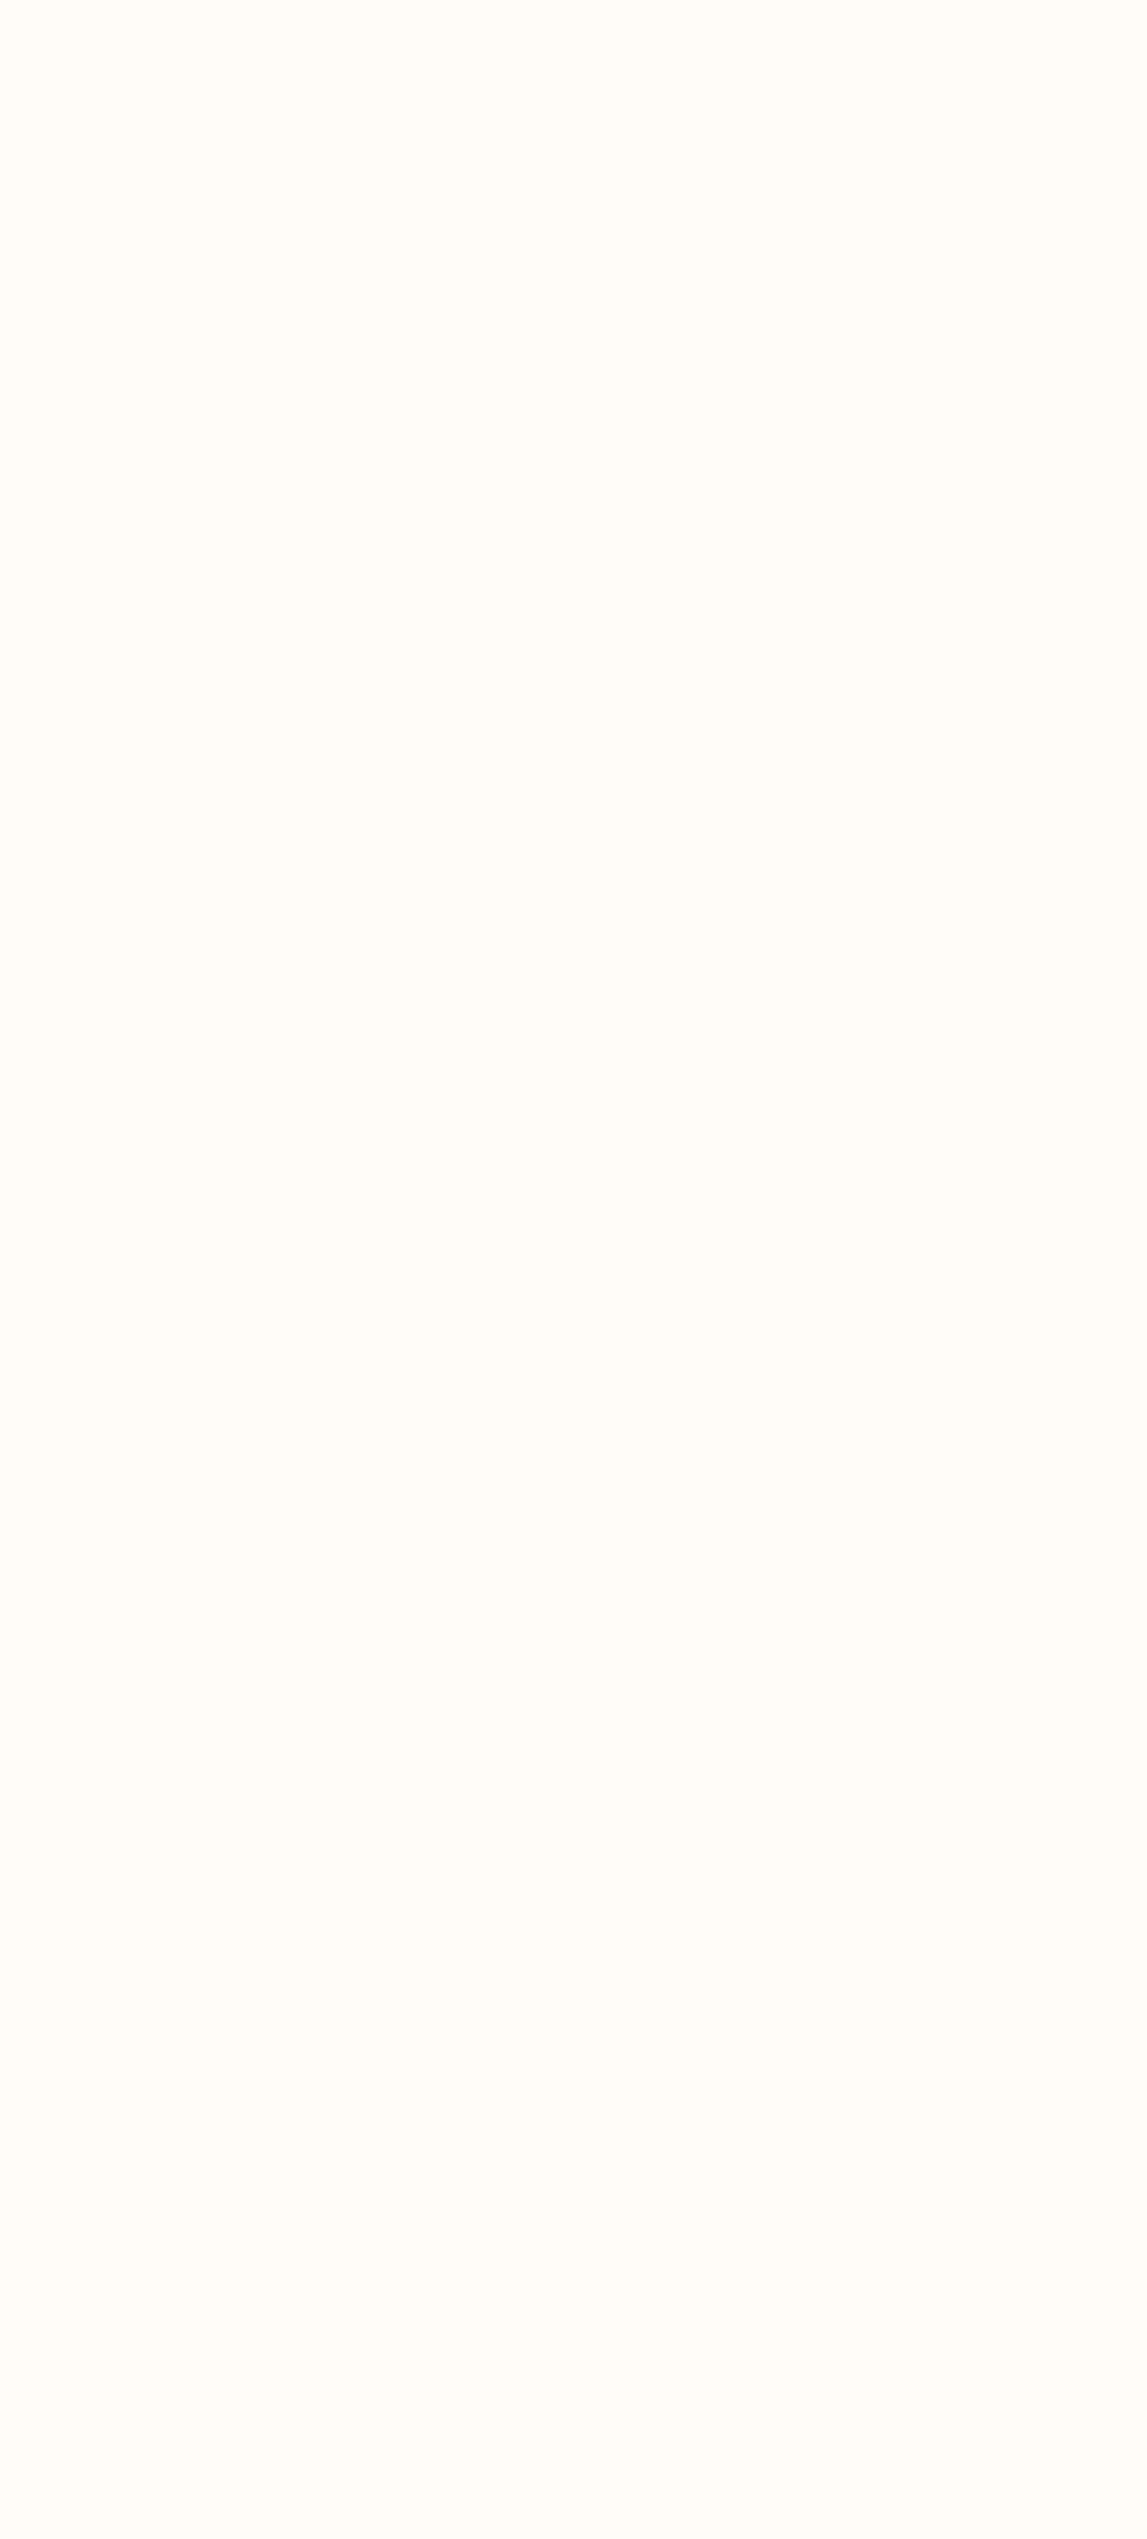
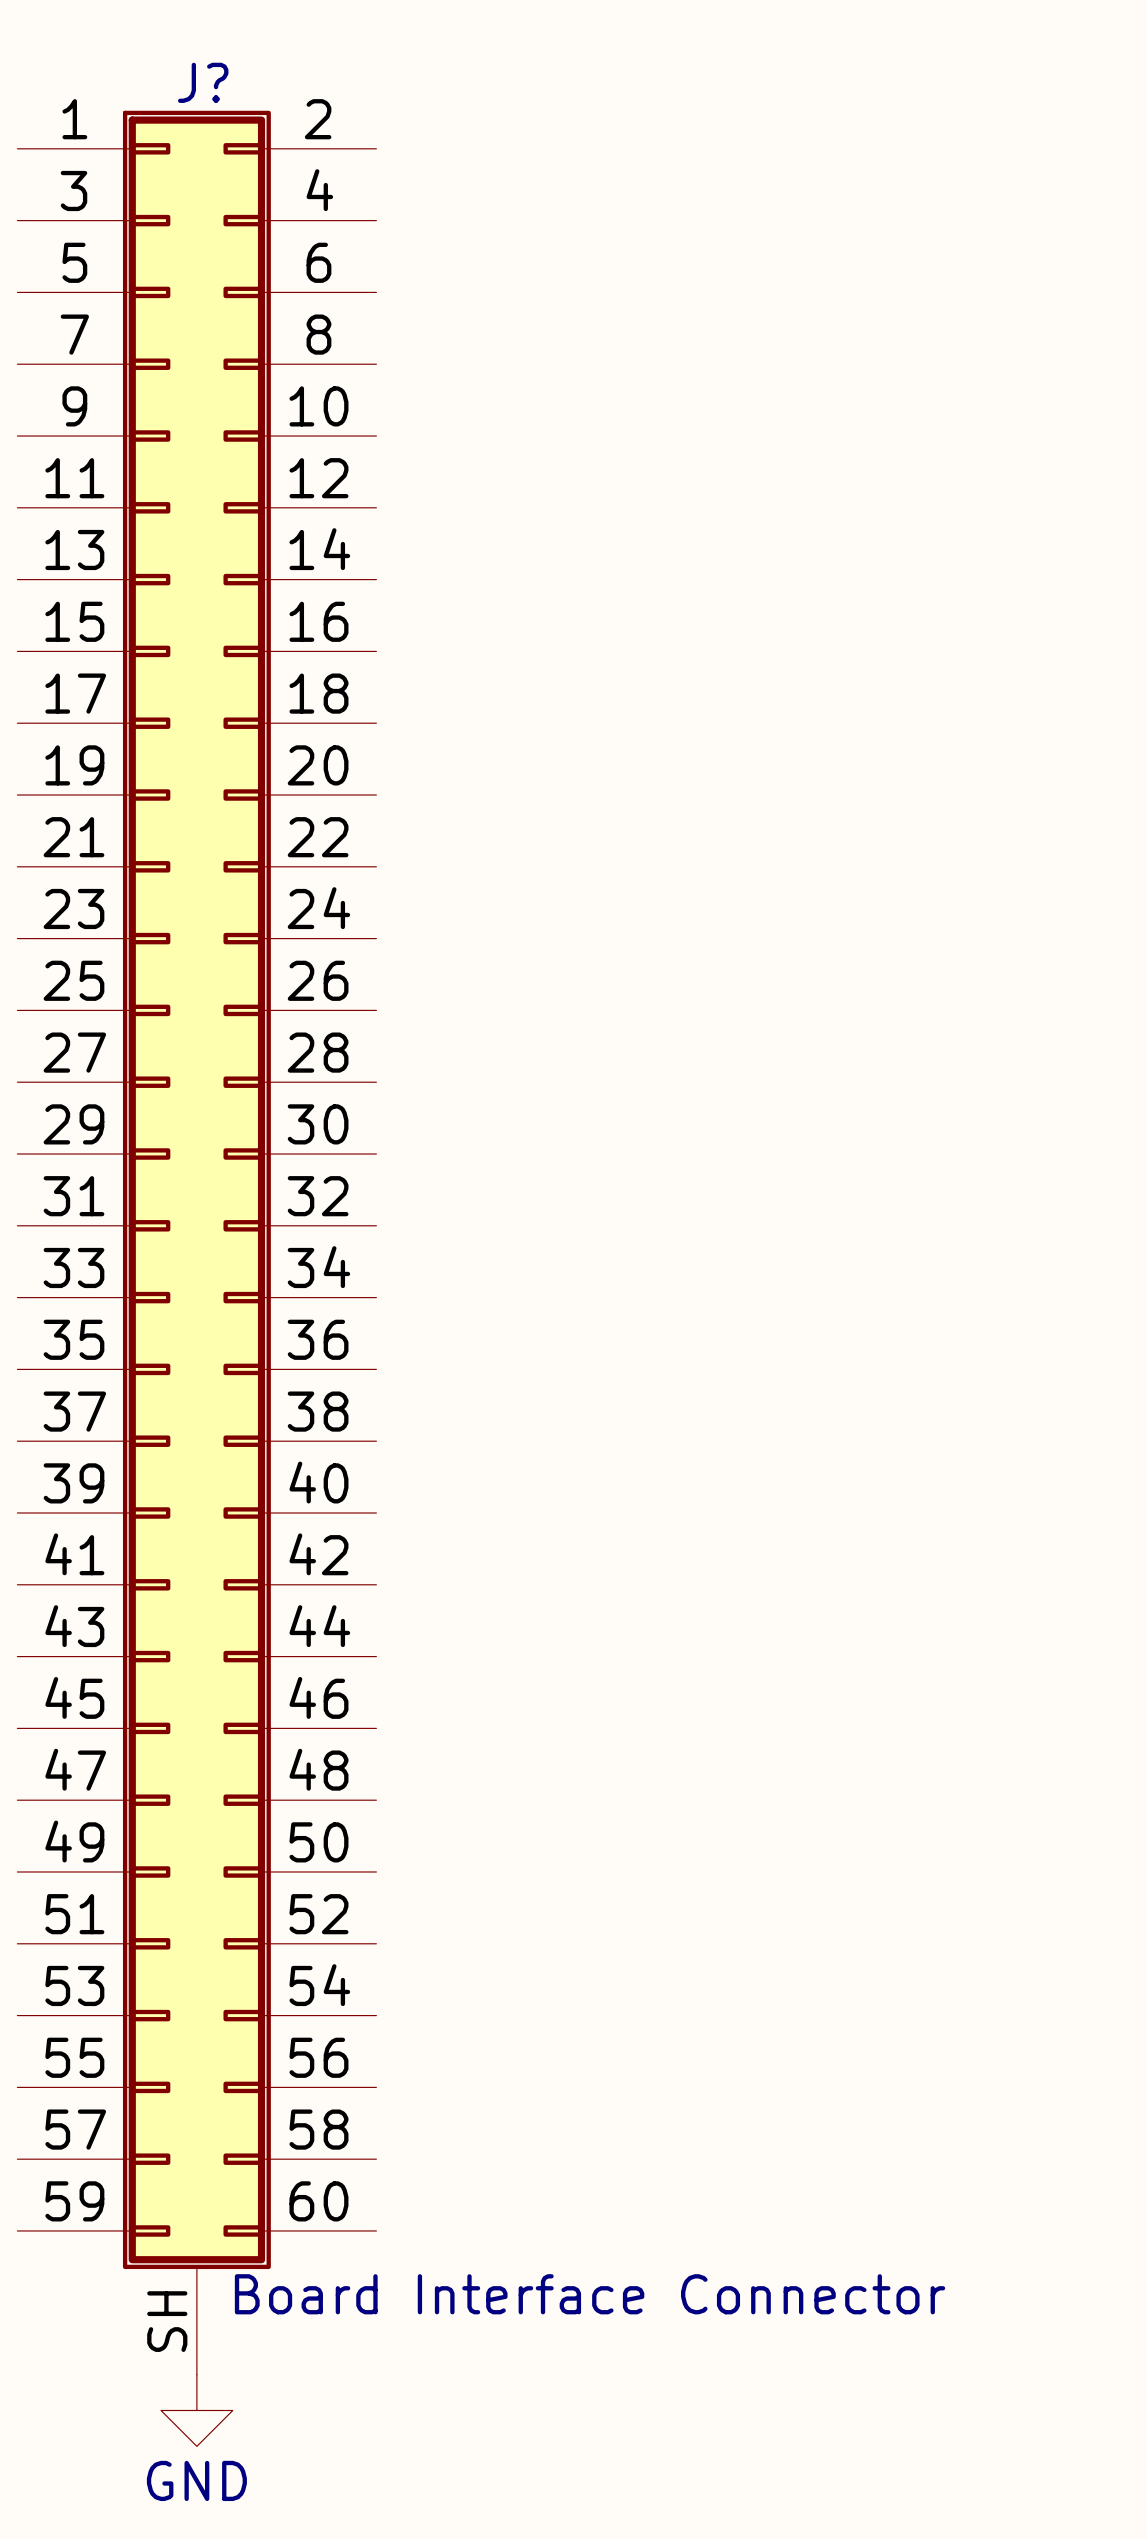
J?: none -> Board Interface Connector (196, 1242)
power symbol: none -> GND (196, 2410)

